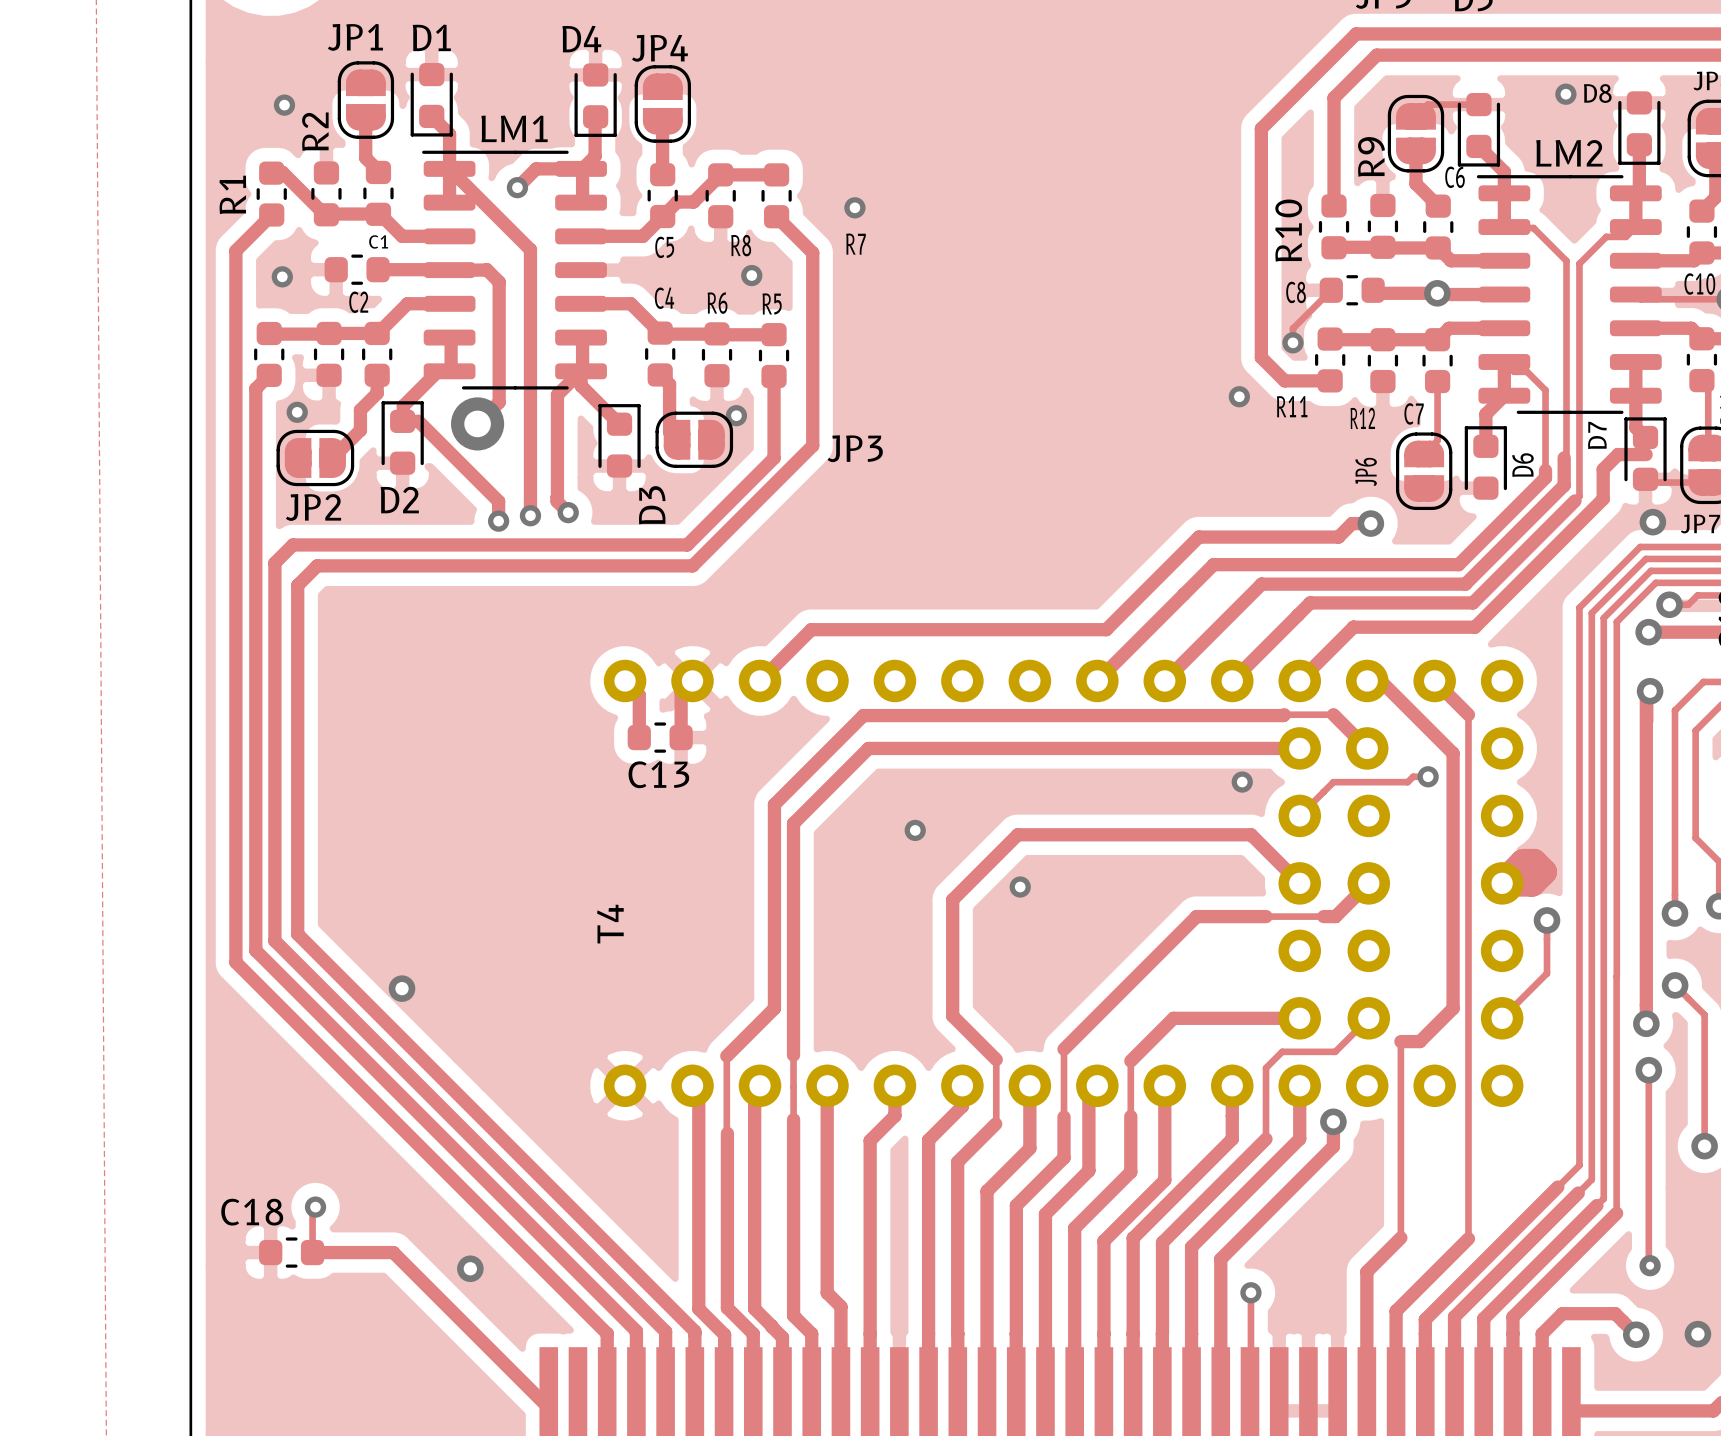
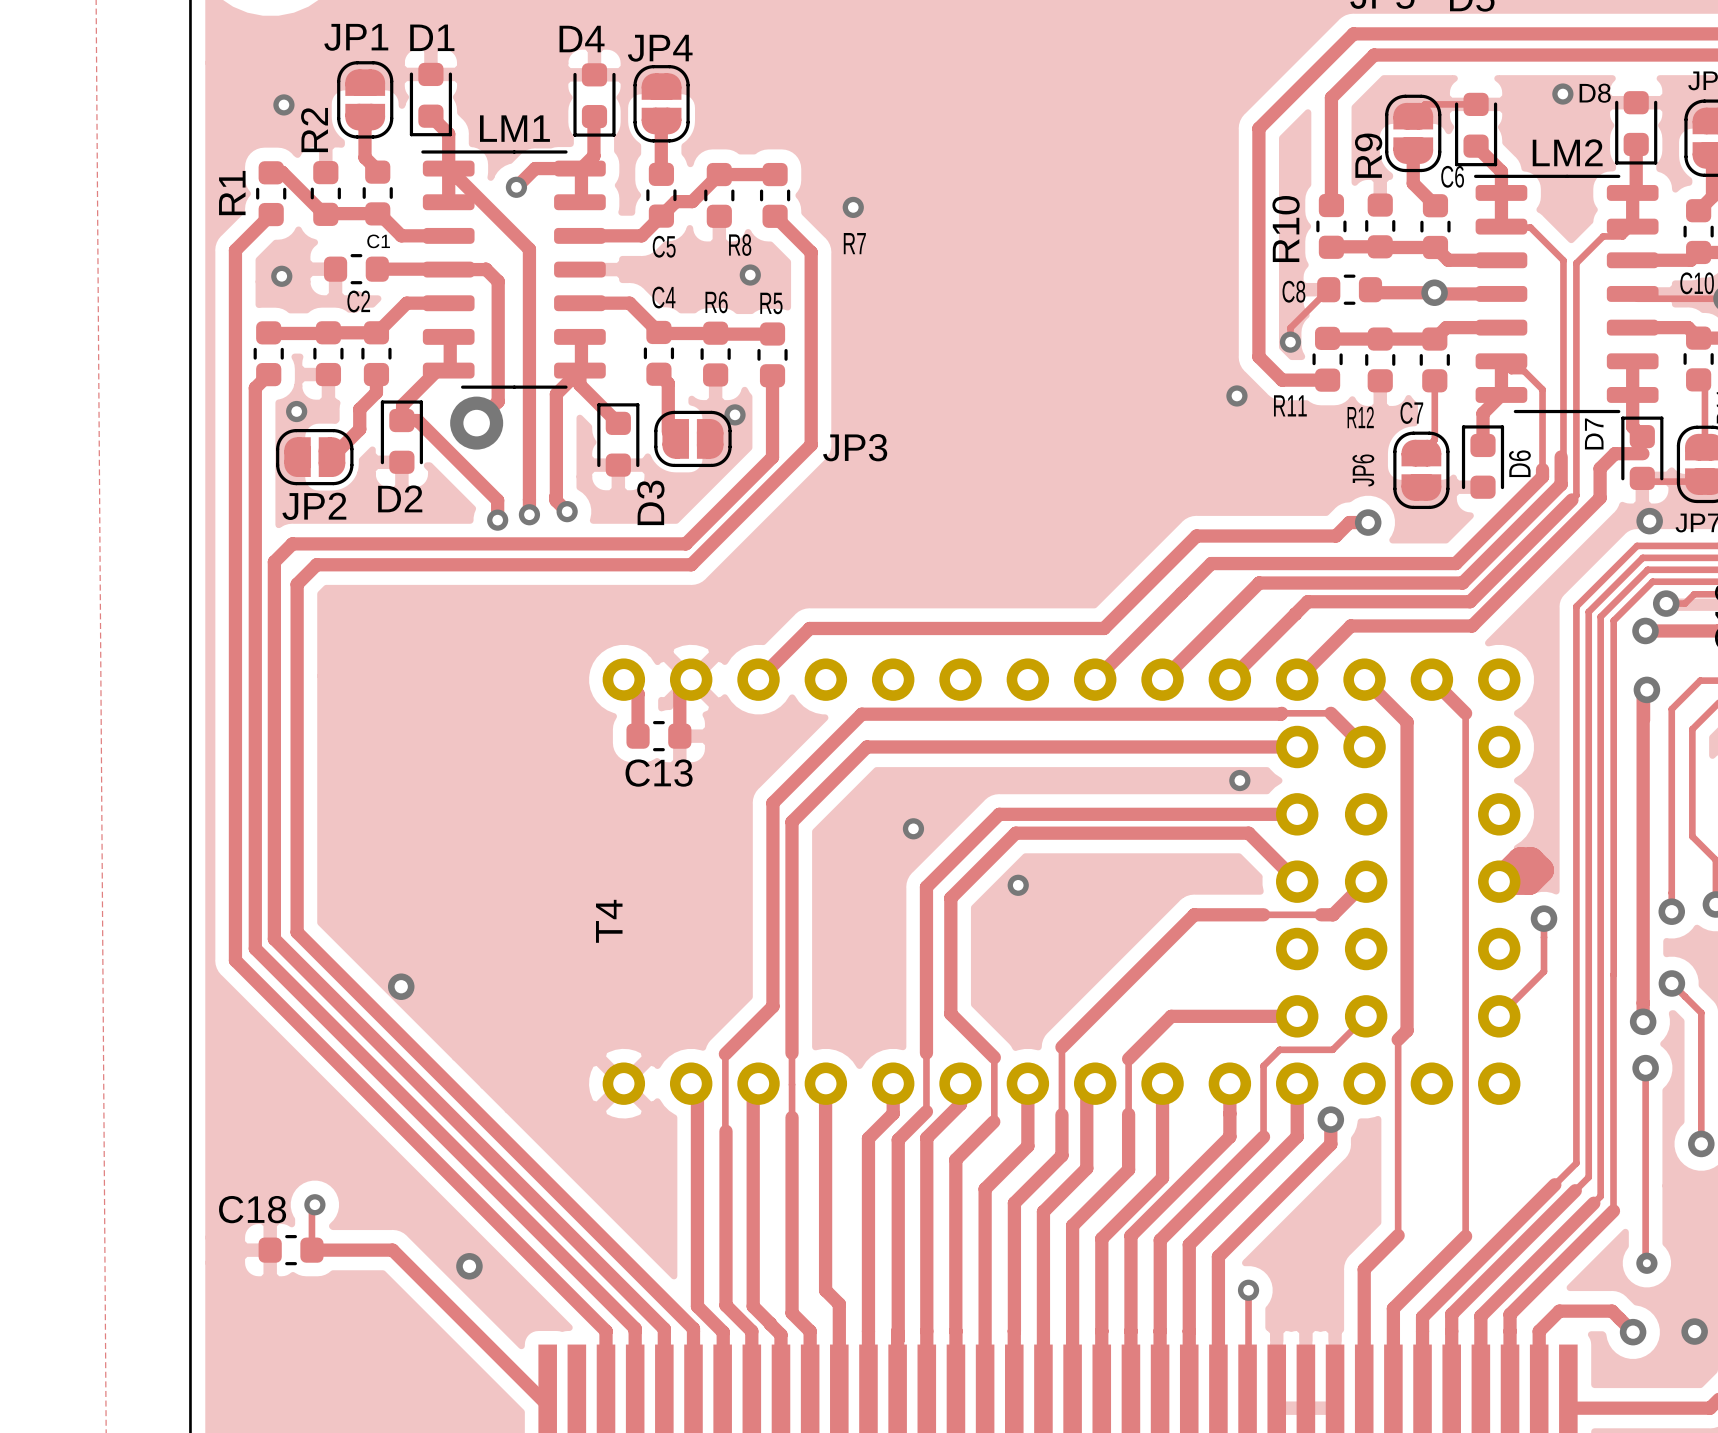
track: (1367, 680) (1380, 680) (1453, 753) (1453, 1008) (1419, 1041) (1400, 1041) -> (1364, 679) (1407, 722) (1407, 1030) (1398, 1039)
track: (1428, 776) (1413, 776) (1407, 782) (1333, 782) (1299, 815) -> (897, 1340) (898, 1139) (926, 1111) (926, 887) (999, 814) (1297, 814)
via: (1428, 776) -> none

